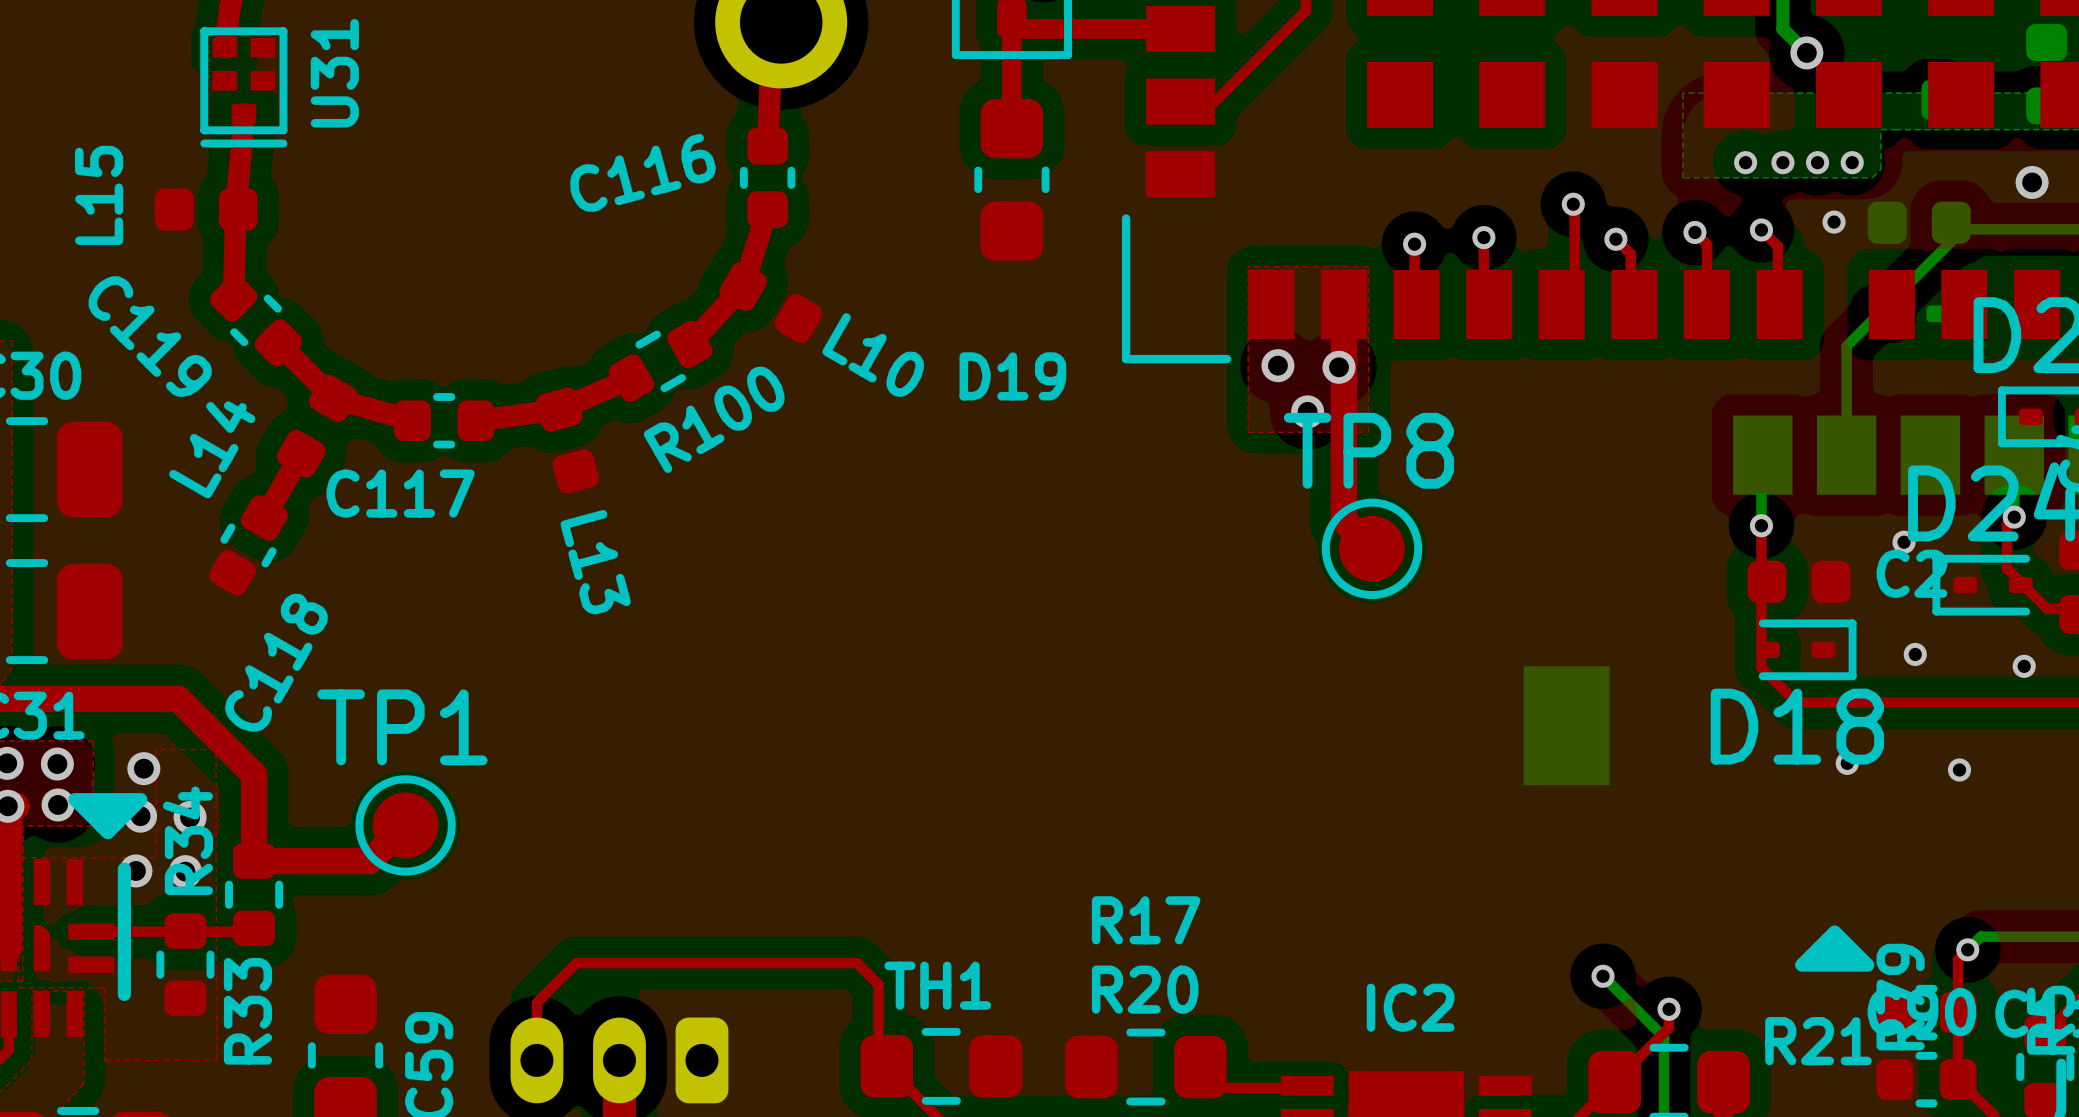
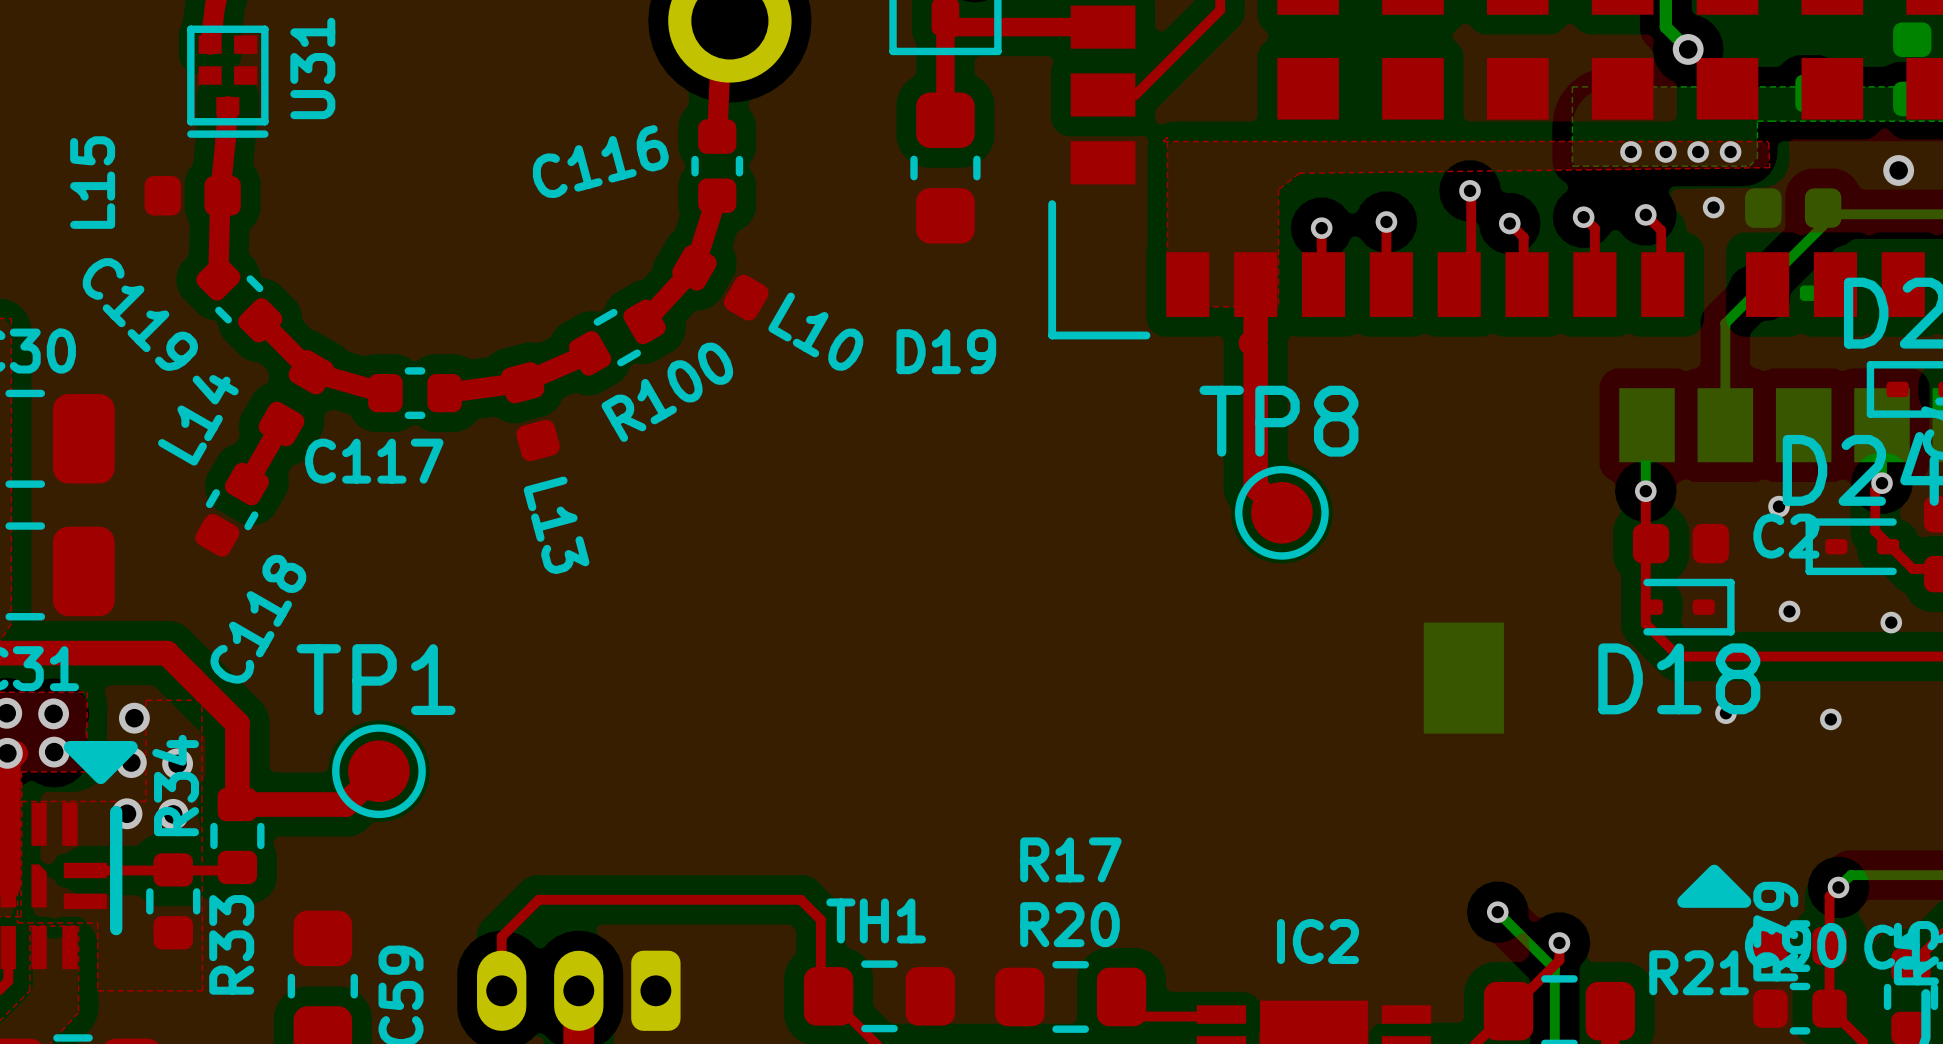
top zone outline: (1368, 266) (1248, 266) (1248, 432) (1368, 432) -> (1278, 249) (1278, 189) (1299, 173) (1769, 167) (1768, 143) (1767, 141) (1163, 141) (1167, 137) (1167, 306) (1278, 306)
top zone outline: (1368, 328) (1368, 431) -> none
via: (1277, 365) -> none
via: (1338, 367) -> none
via: (1307, 411) -> none

